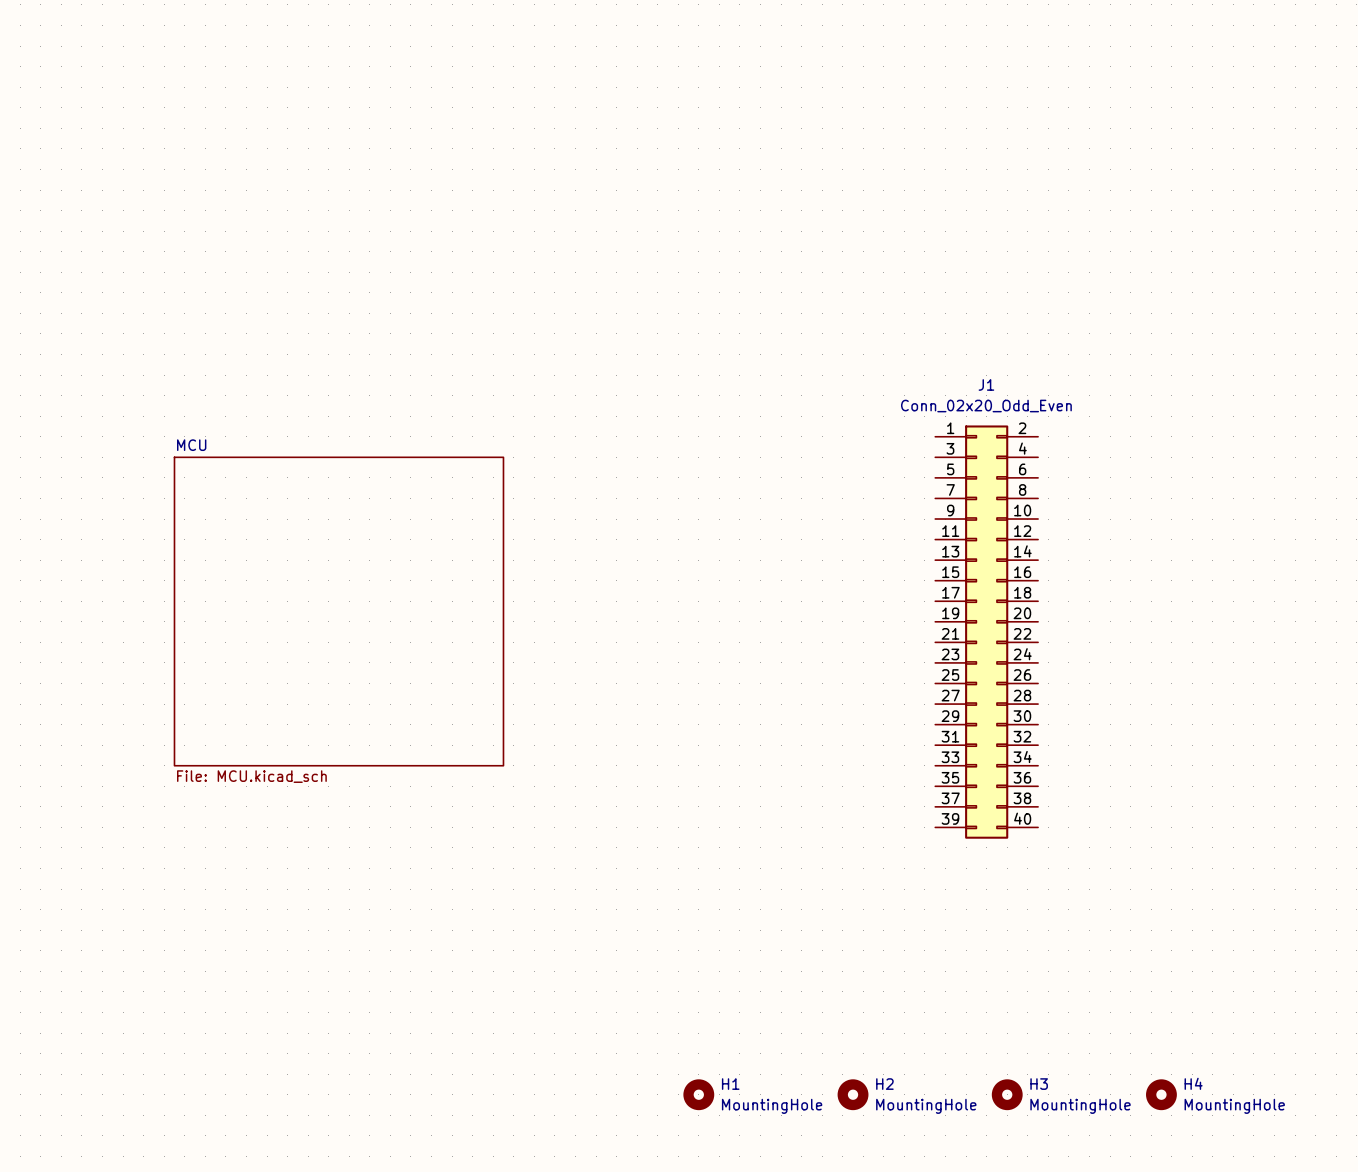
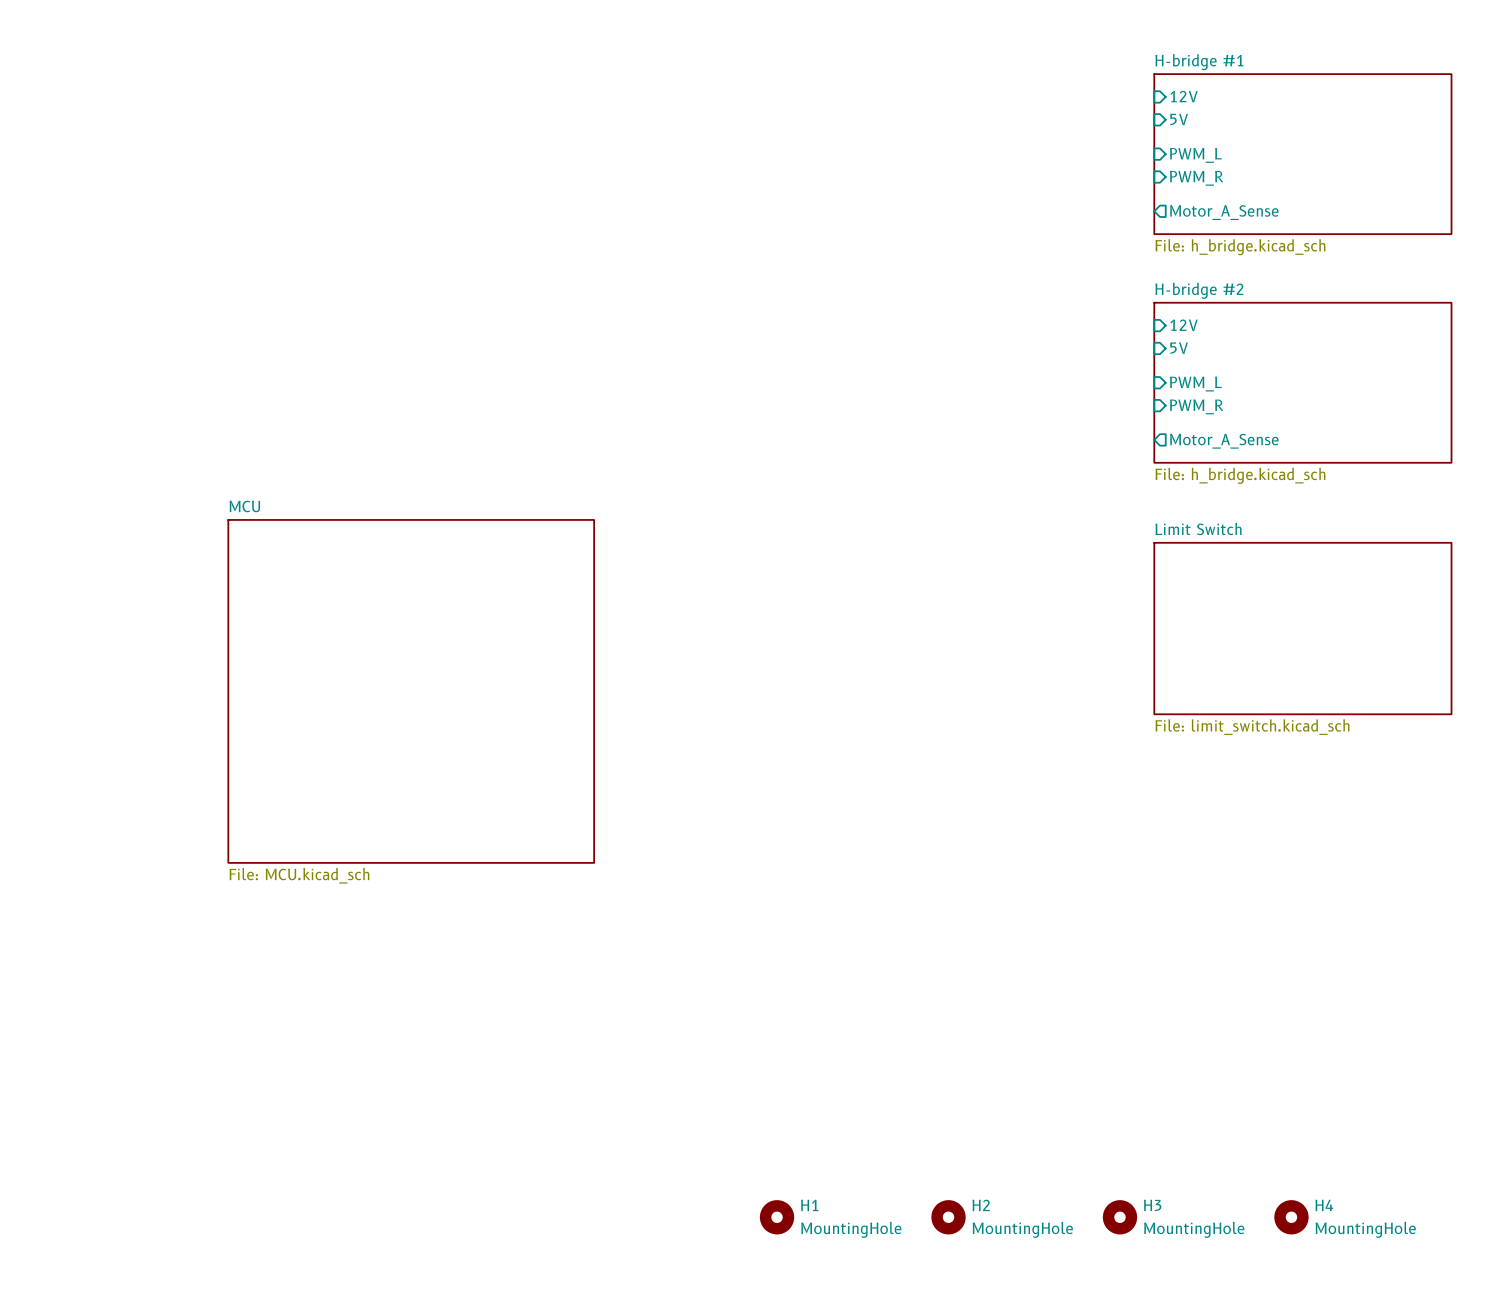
sheet pin: none -> 12V (1183, 96)
sheet pin: none -> 5V (1179, 119)
sheet pin: none -> PWM_L (1195, 155)
sheet H-bridge #1: none -> File: h_bridge.kicad_sch (1302, 154)
sheet pin: none -> PWM_R (1196, 178)
sheet pin: none -> Motor_A_Sense (1224, 212)
sheet pin: none -> 12V (1183, 325)
sheet pin: none -> 5V (1179, 348)
sheet pin: none -> PWM_L (1195, 384)
sheet H-bridge #2: none -> File: h_bridge.kicad_sch (1302, 382)
sheet pin: none -> PWM_R (1196, 406)
sheet pin: none -> Motor_A_Sense (1224, 441)
sheet Limit Switch: none -> File: limit_switch.kicad_sch (1302, 628)
sheet MCU position: (338, 611) -> (411, 691)
J1: Conn_02x20_Odd_Even (986, 632) -> none

